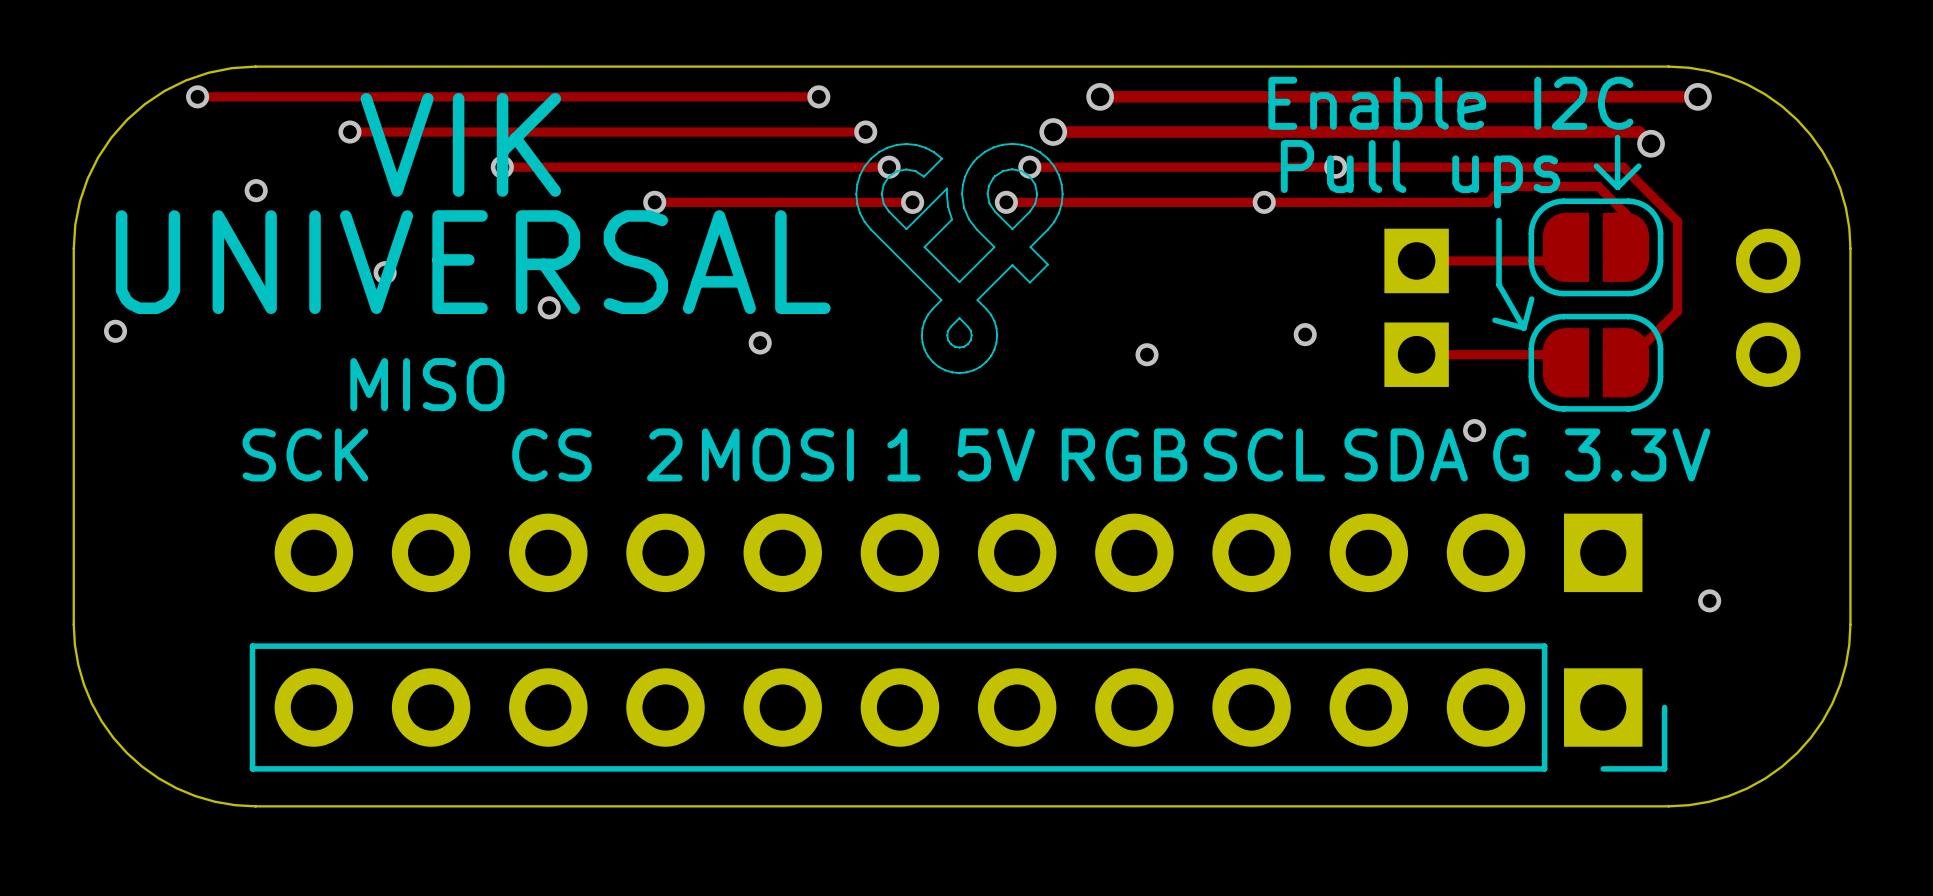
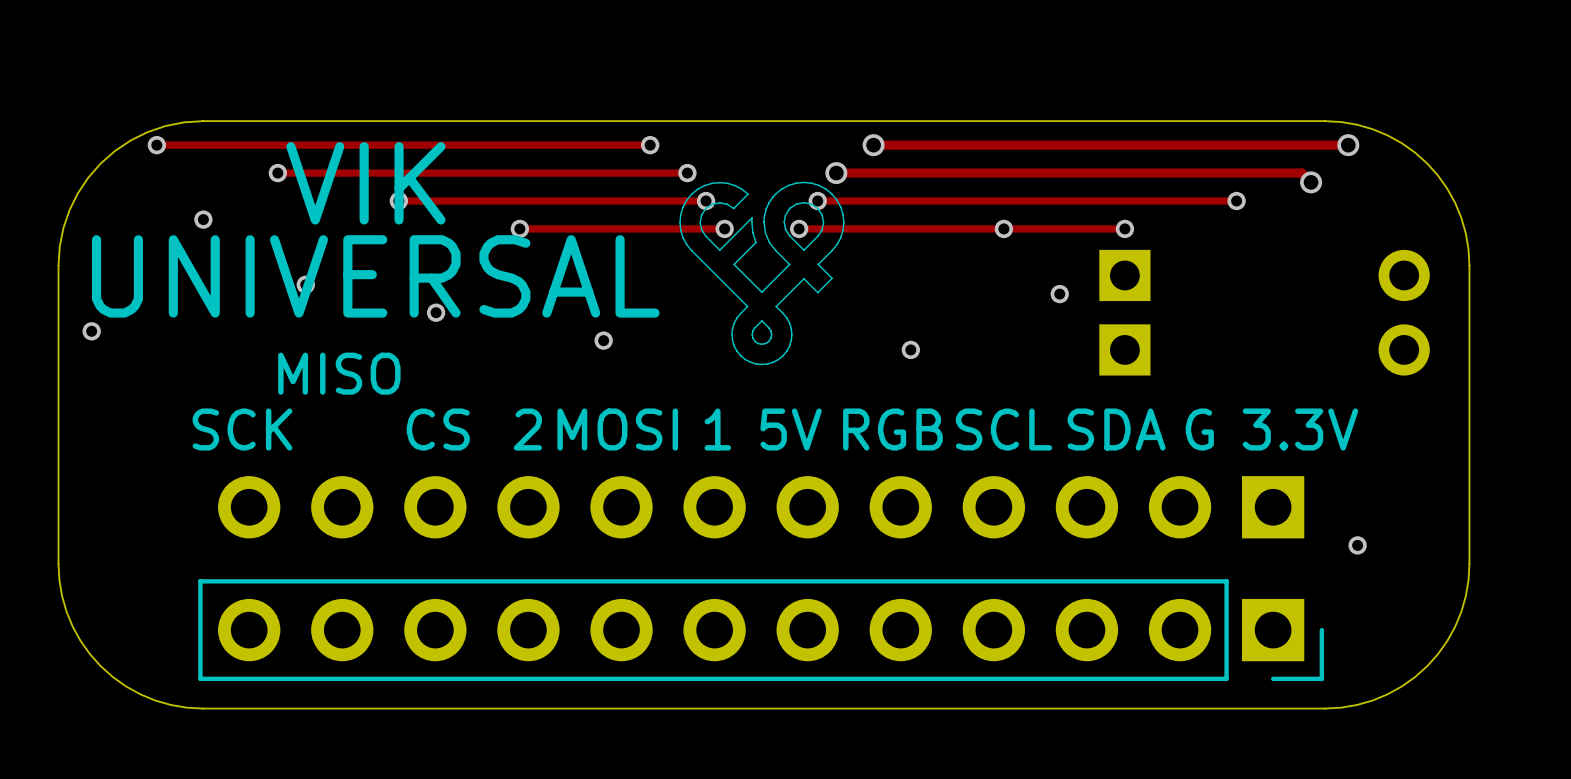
text: Enable I2C (1450, 103) -> none
line: (1617, 137) (1617, 187) -> none
line: (1596, 166) (1617, 187) -> none
line: (1638, 166) (1617, 187) -> none
via: (1335, 167) -> none
track: (1557, 167) (1623, 167) (1677, 221) (1677, 311) (1625, 362) -> none
via: none -> (1236, 201)
text: Pull ups (1420, 174) -> none
track: (1416, 202) (1488, 202) (1504, 186) (1598, 186) (1625, 214) (1625, 247) -> none
via: none -> (1124, 228)
line: (1499, 220) (1499, 284) (1523, 328) -> none
track: (1565, 247) (1552, 260) (1416, 260) -> none
part: (1595, 247) -> none
via: none -> (1059, 294)
line: (1531, 299) (1523, 328) -> none
line: (1494, 320) (1523, 328) -> none
via: (1305, 334) -> none
track: (1416, 354) (1557, 354) (1565, 362) -> none
part: (1595, 362) -> none
via: (1474, 430) -> none

